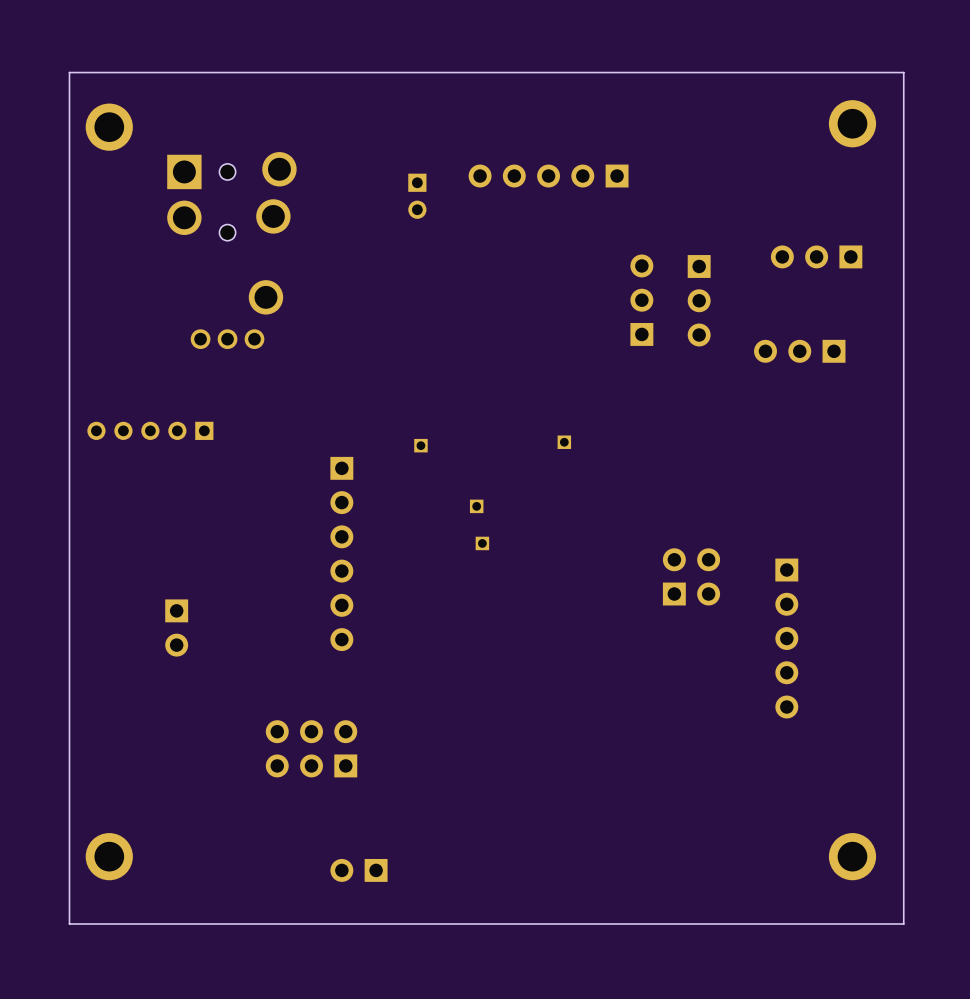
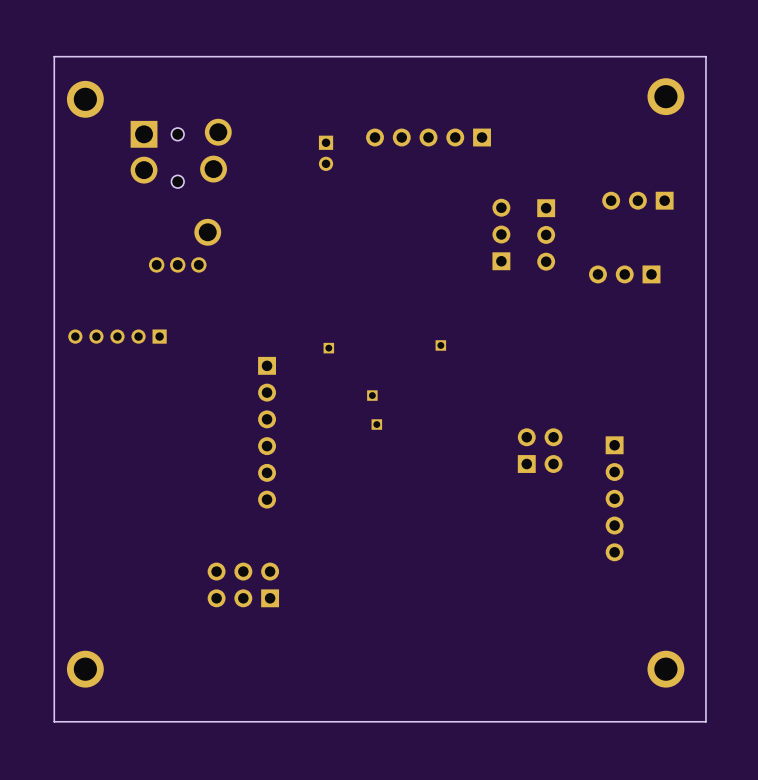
part: (176, 627) -> none
part: (358, 870) -> none

